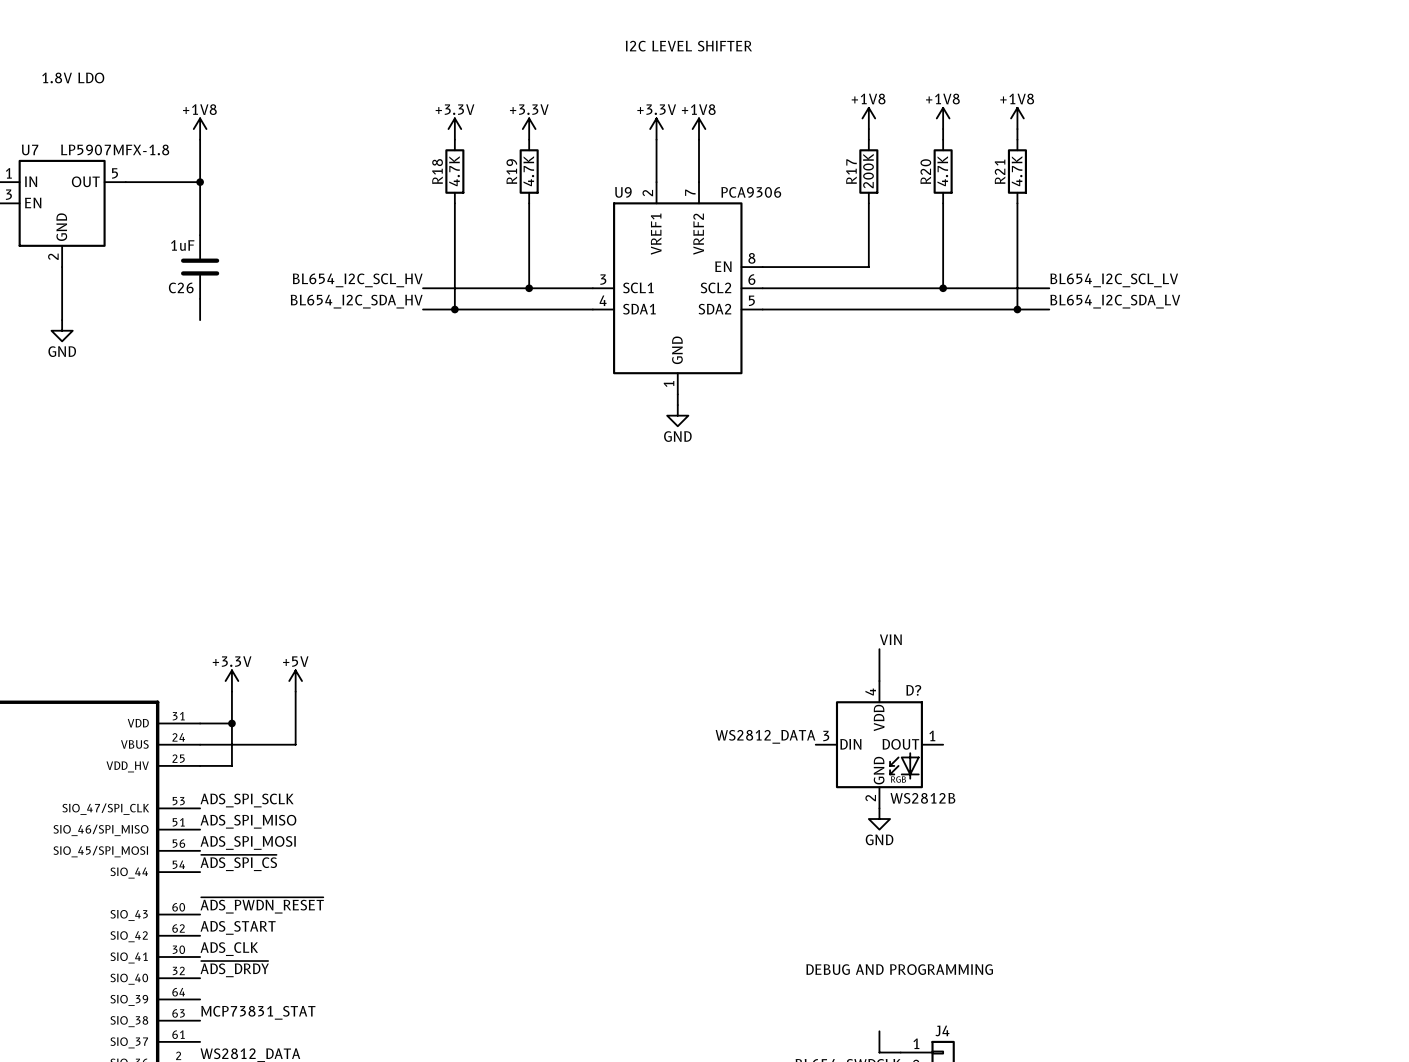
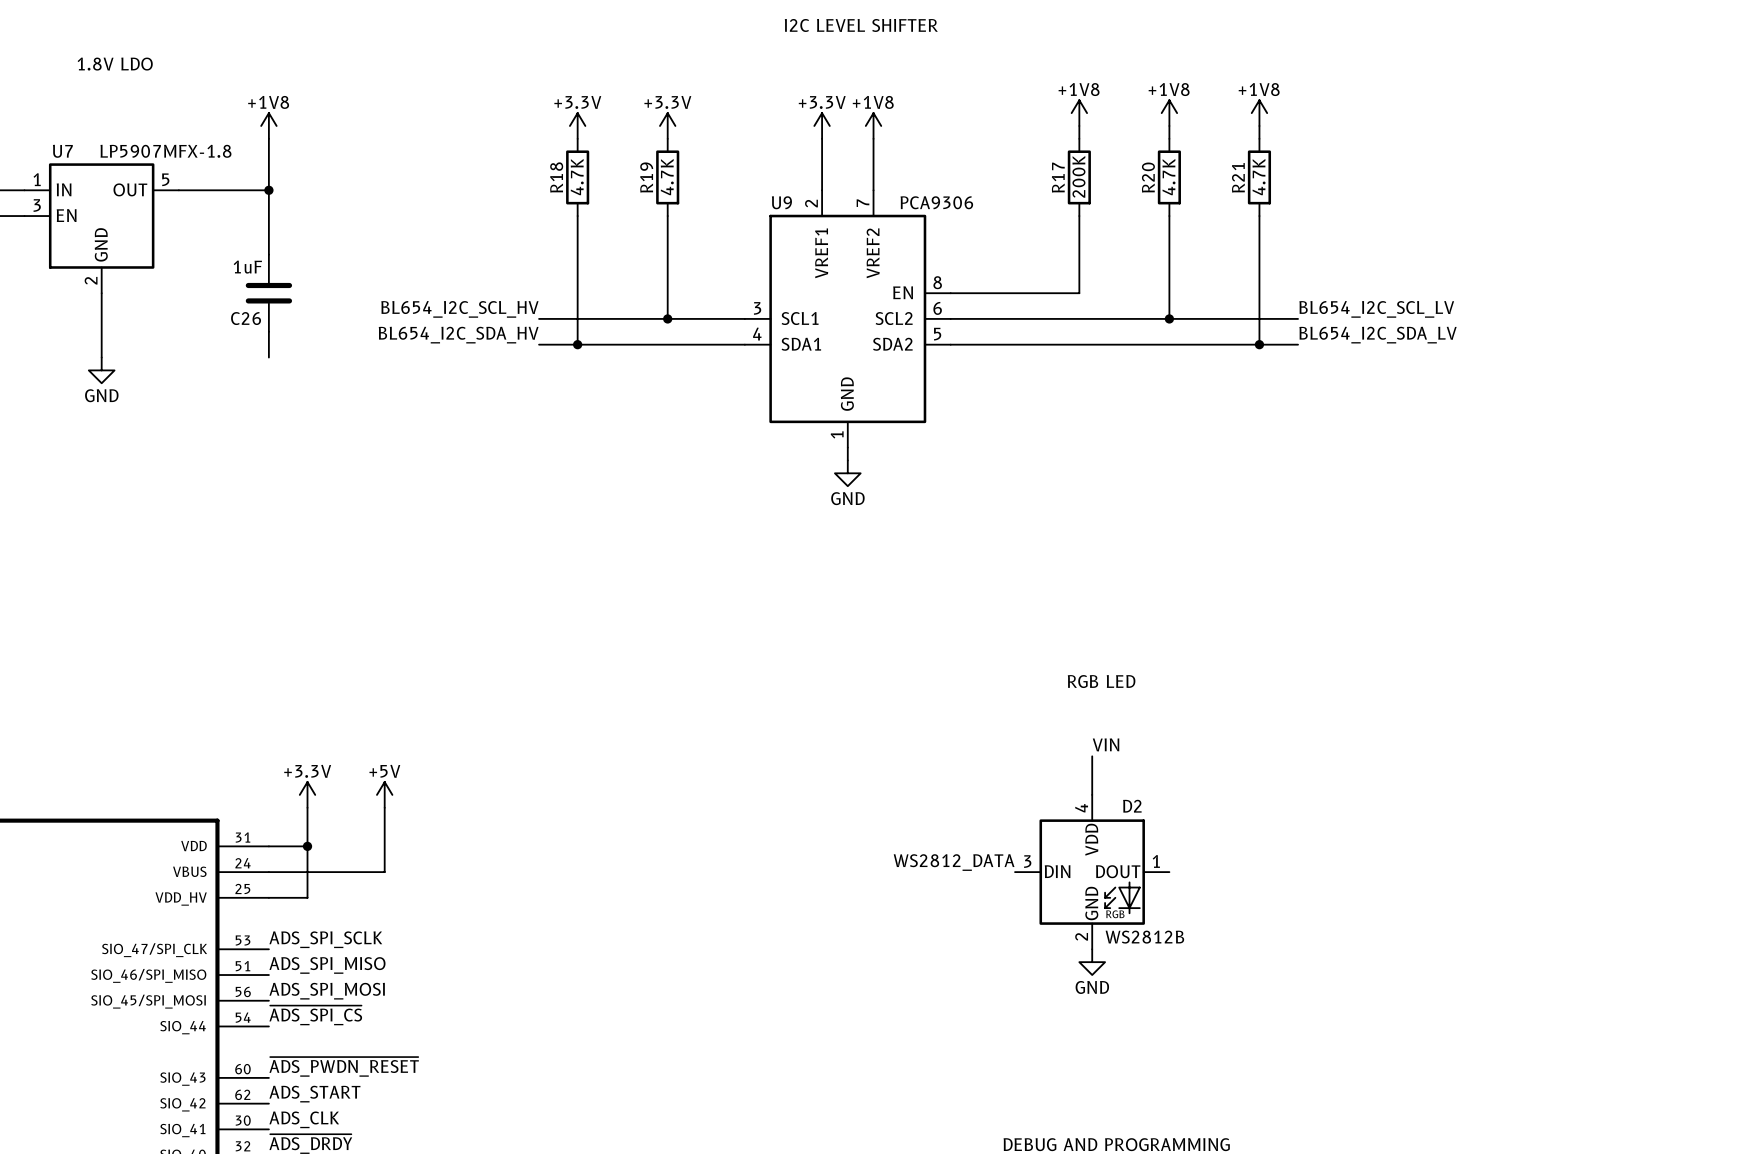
text: none -> RGB LED (1101, 681)
D? name: D? (913, 690) -> D2 (1132, 806)

